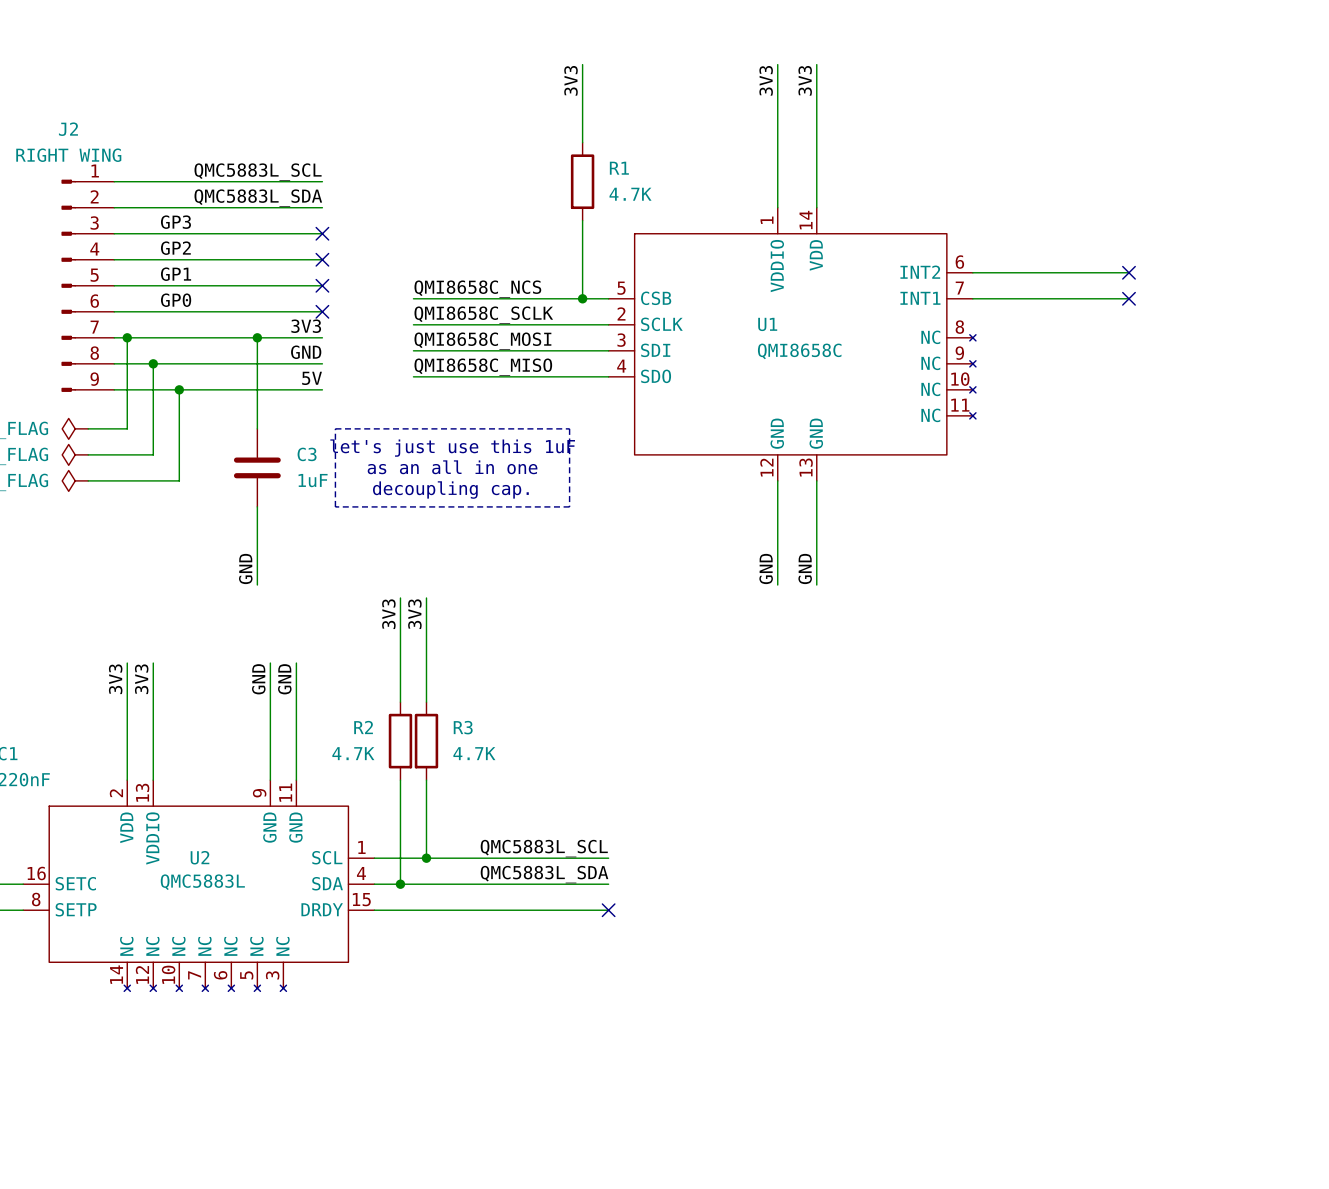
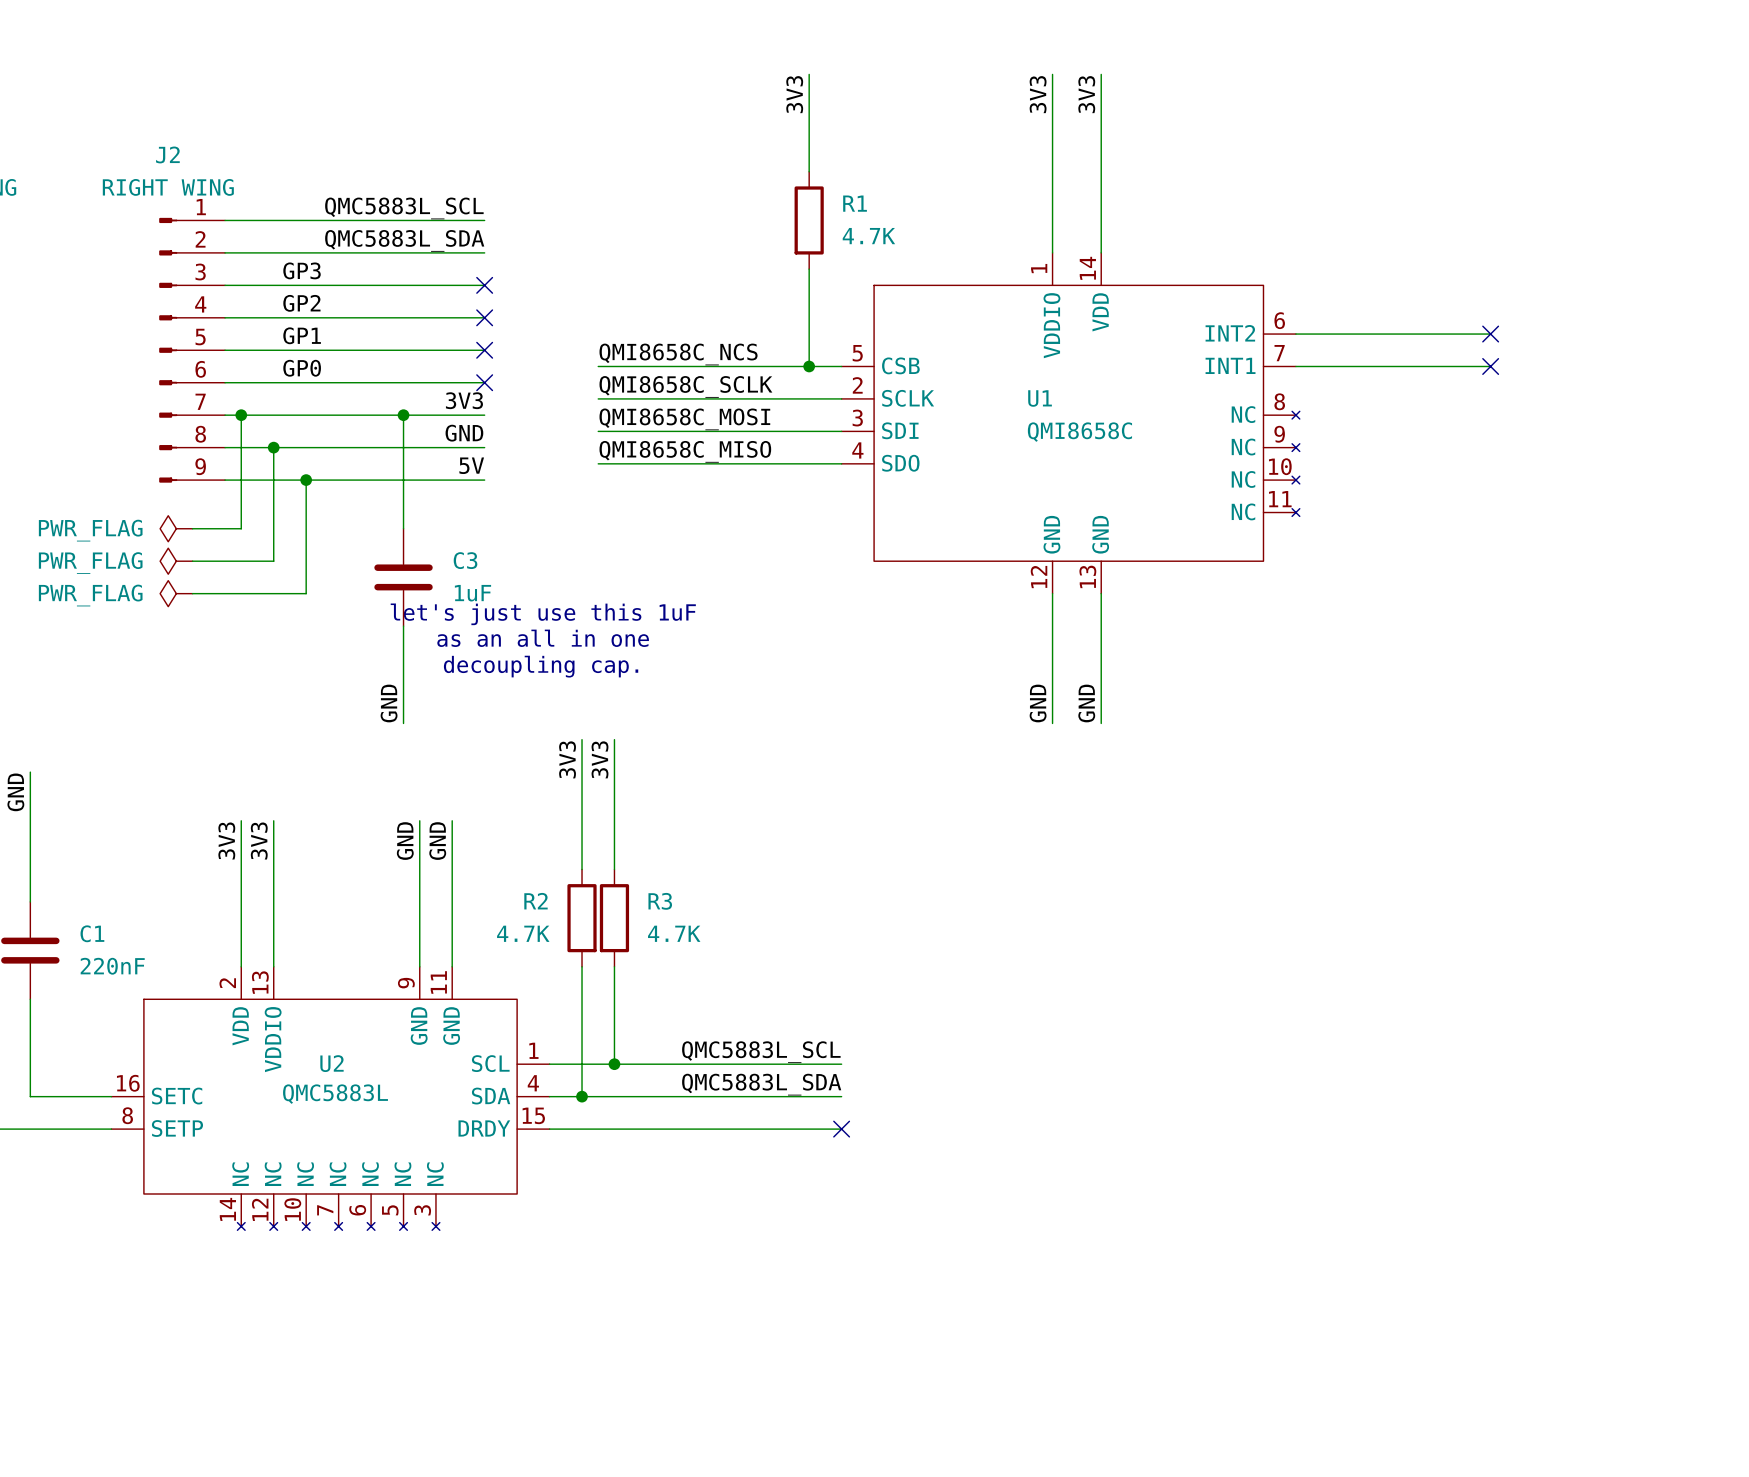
line: (335, 428) (569, 428) (569, 506) (335, 506) (335, 428) -> none
text position: let's just use this 1uF (452, 448) -> let's just use this 1uF (543, 614)
text position: as an all in one (452, 467) -> as an all in one (543, 638)
text position: decoupling cap. (450, 490) -> decoupling cap. (541, 666)

